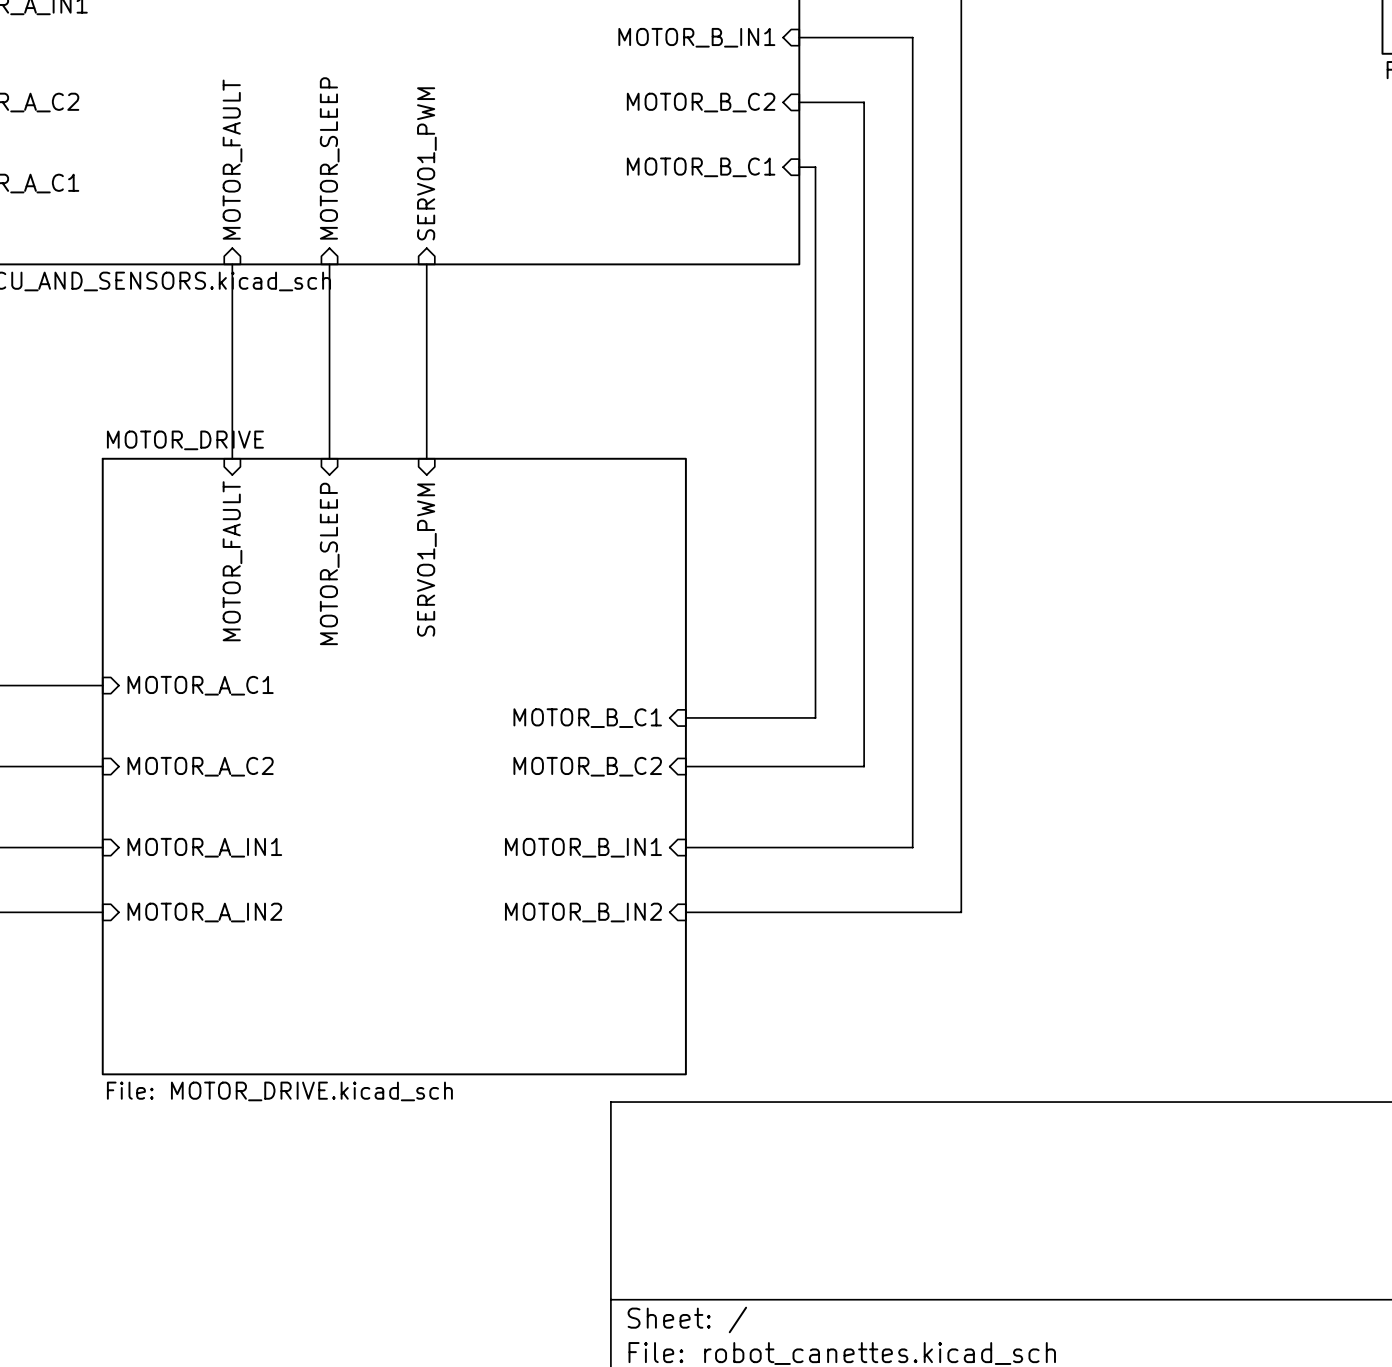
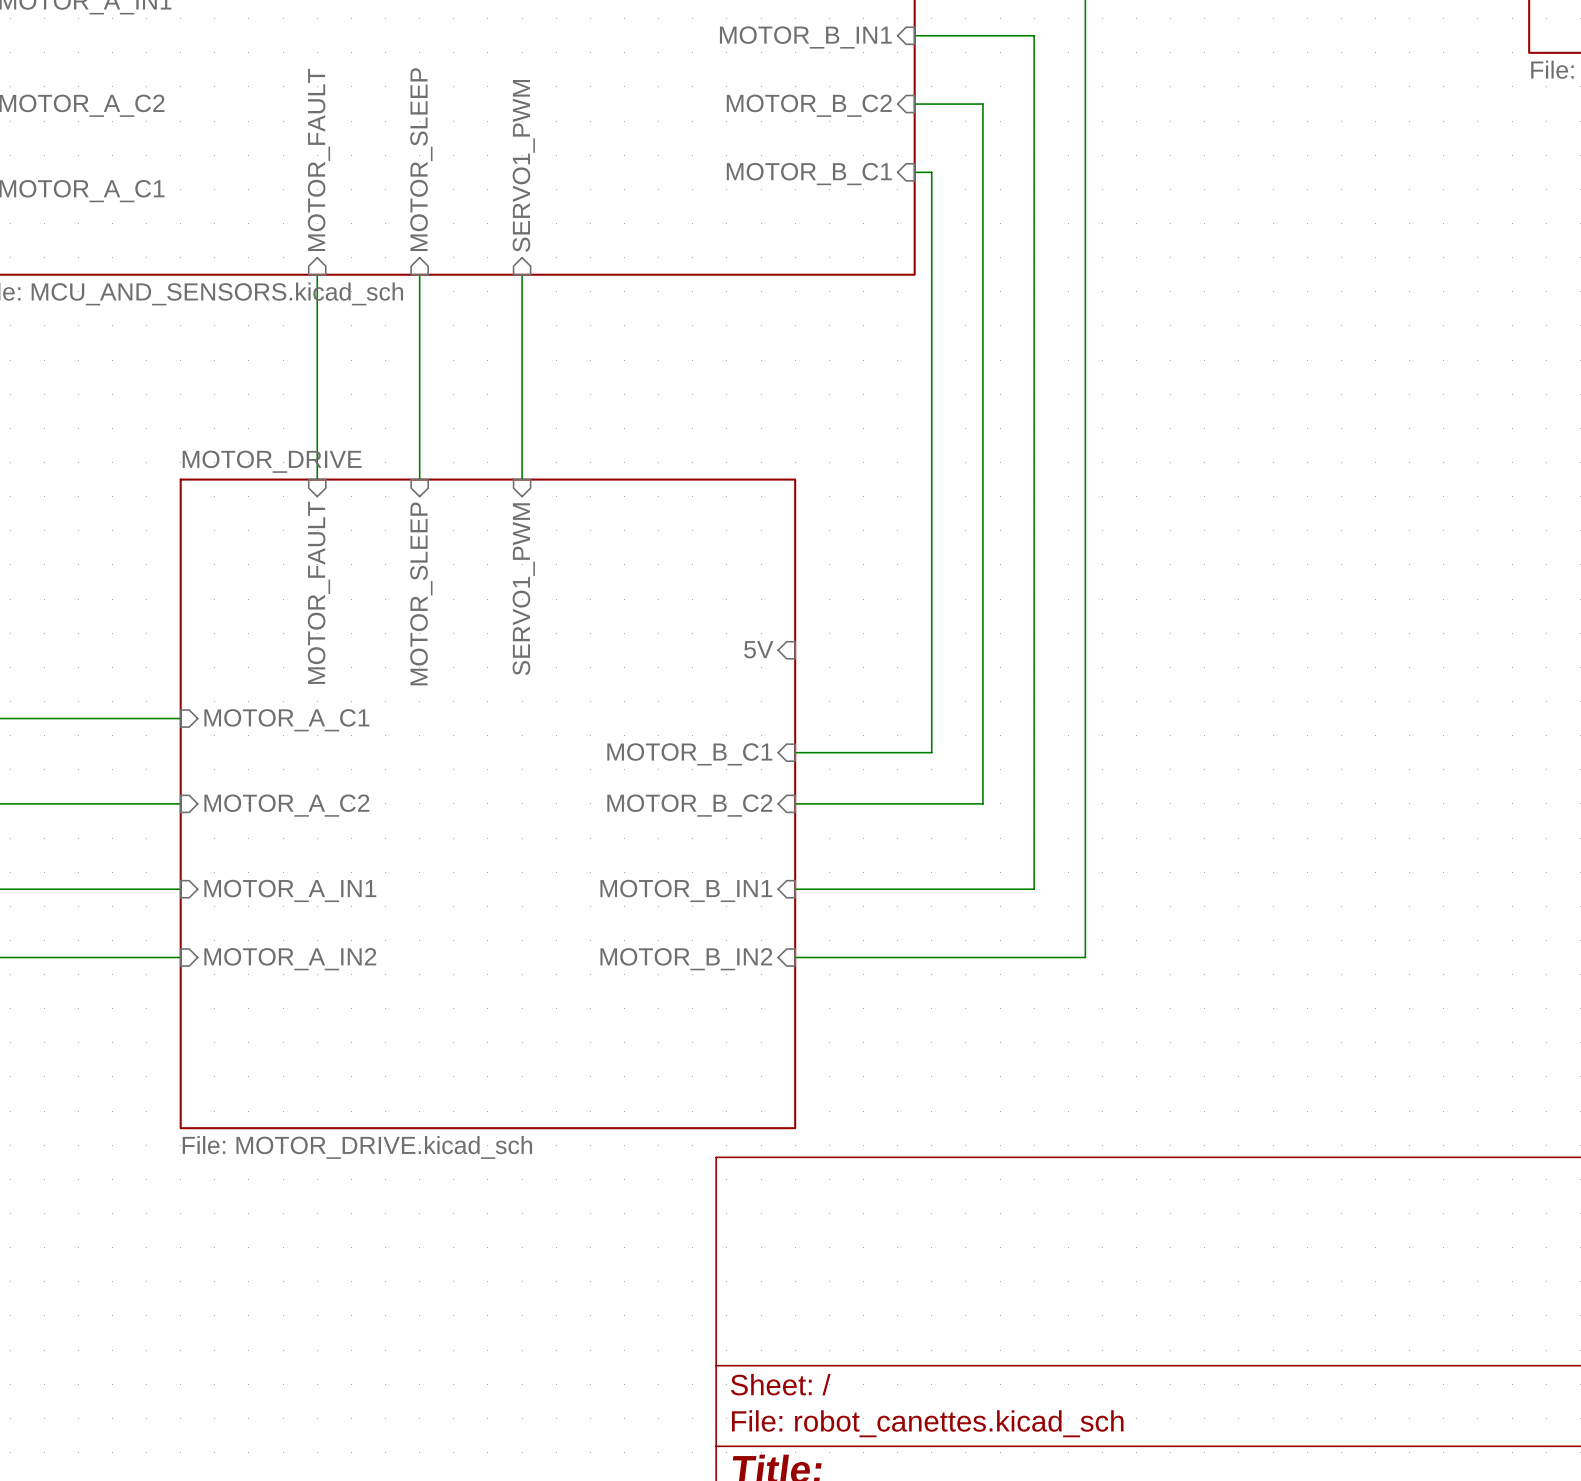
sheet pin: none -> 5V (758, 649)

